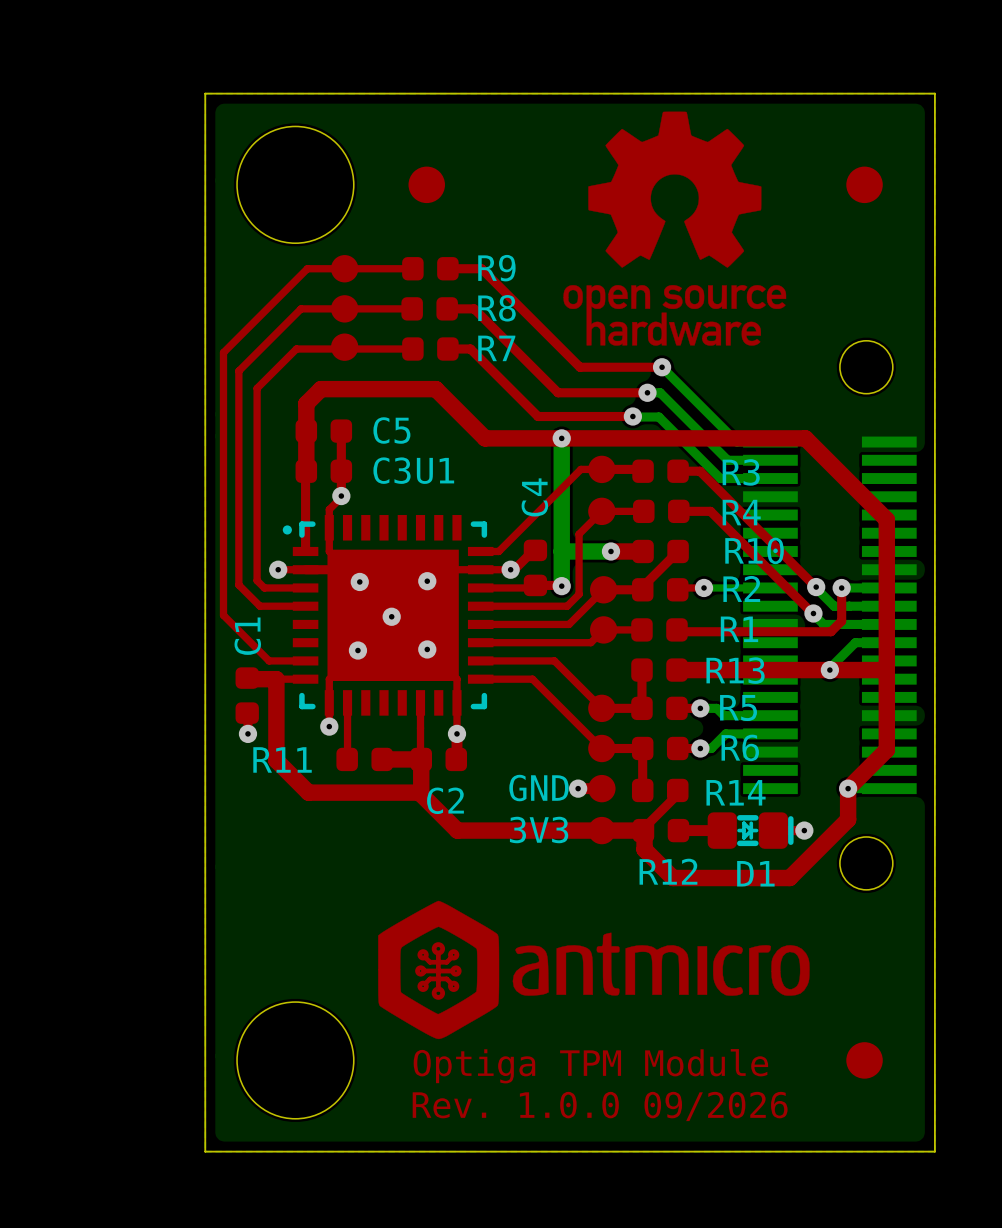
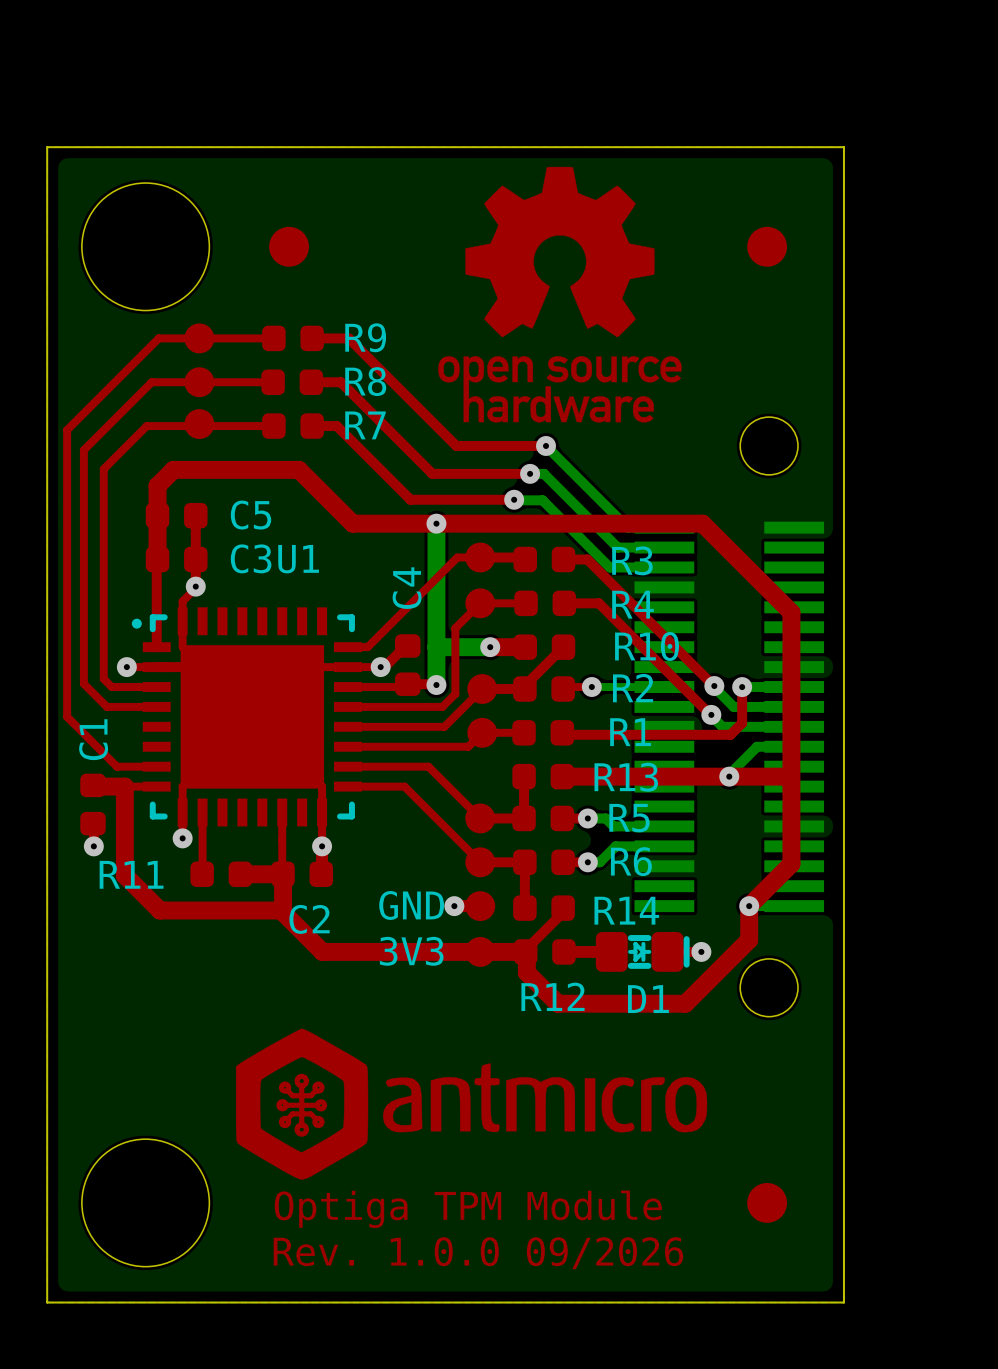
via: (359, 581) -> none
via: (427, 581) -> none
via: (391, 616) -> none
via: (427, 649) -> none
via: (357, 650) -> none

